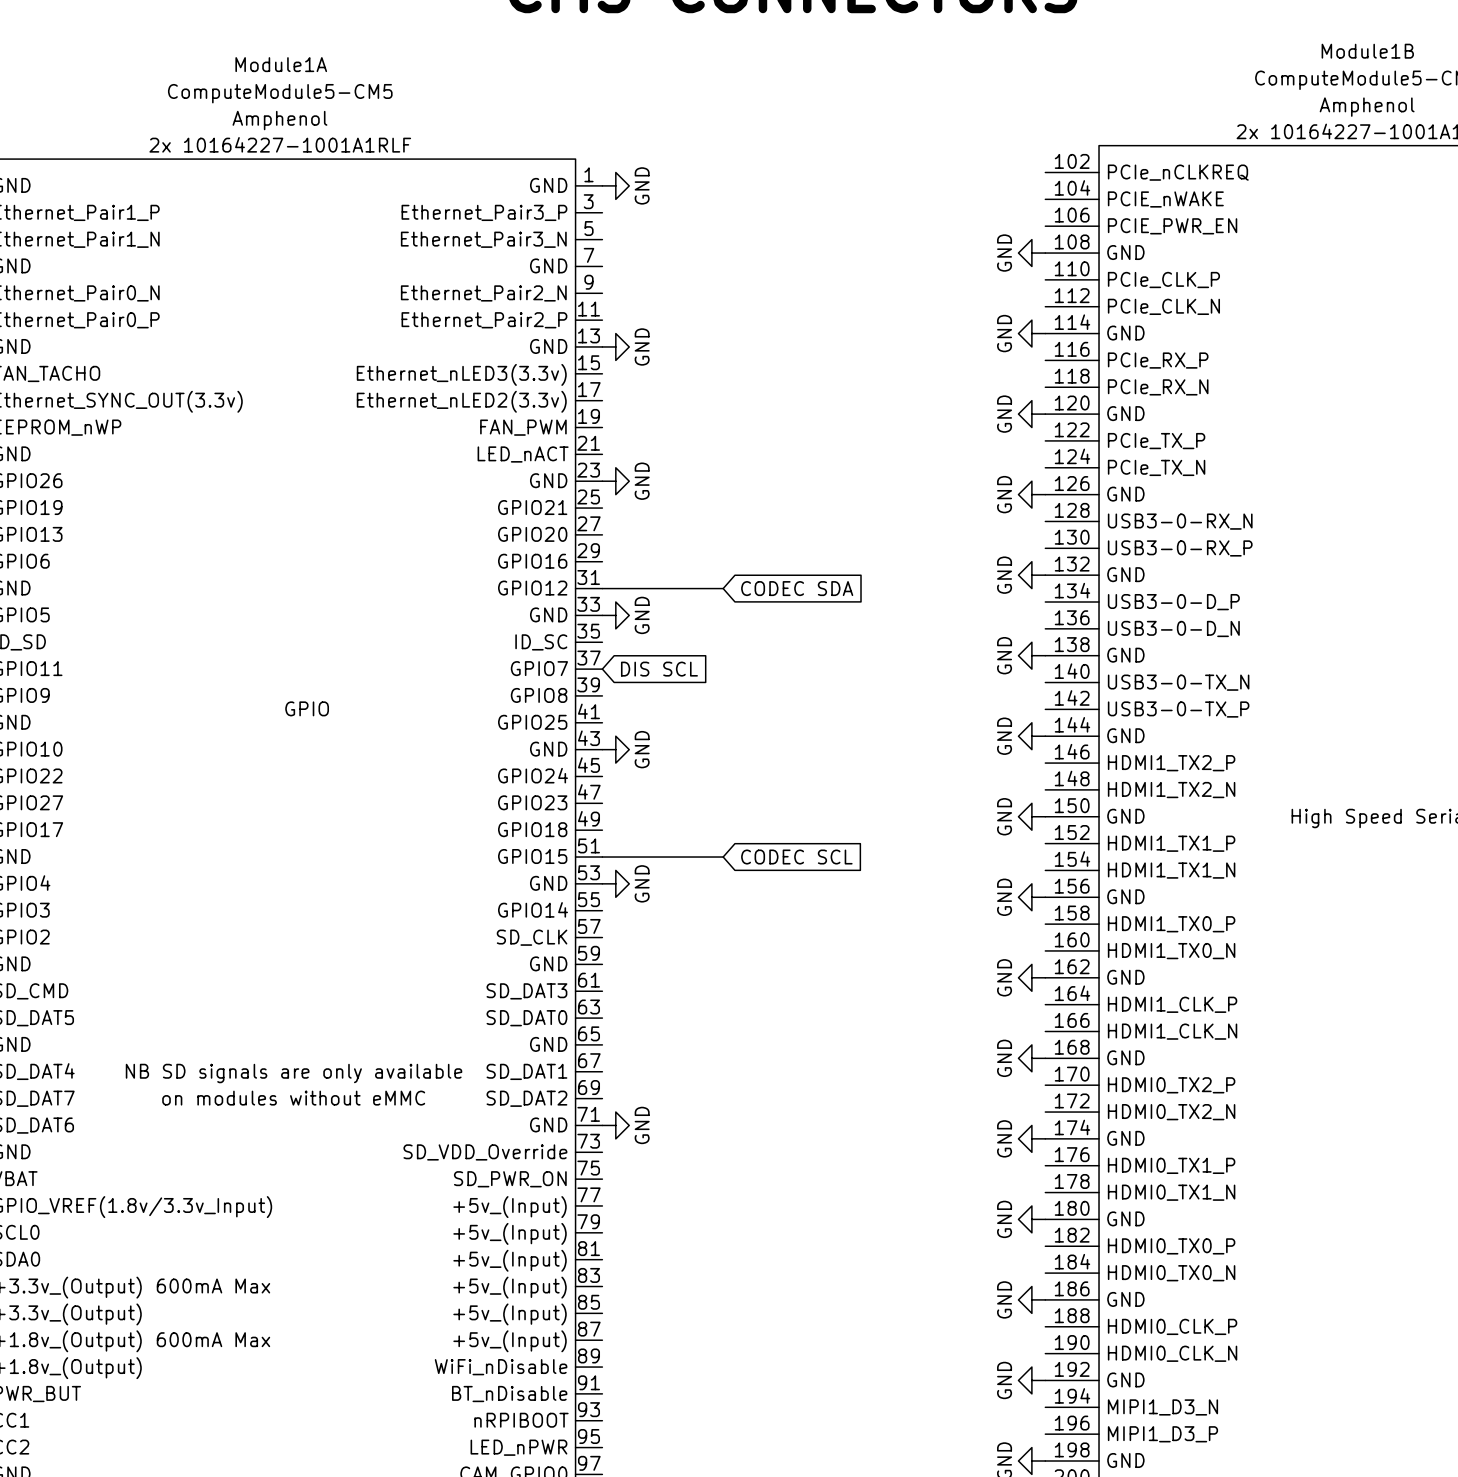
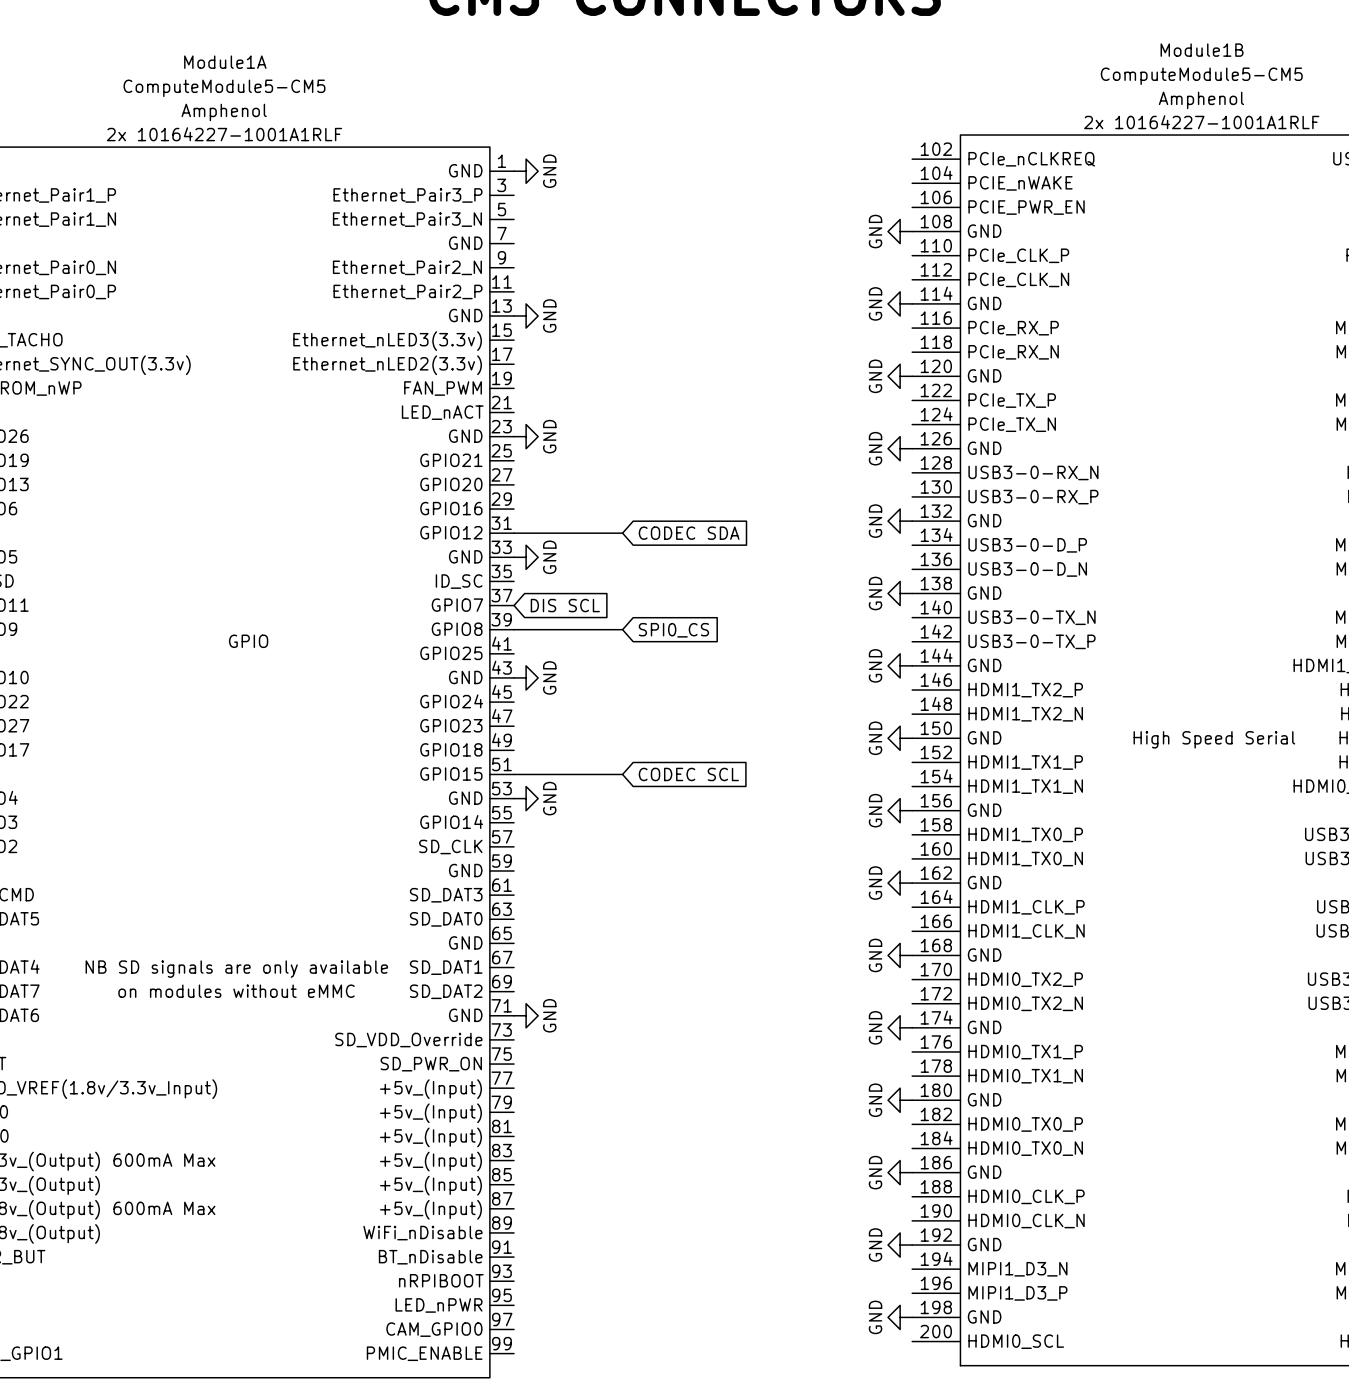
wire: none -> (514, 629) (622, 629)
global label: none -> SPI0_CS (673, 630)

